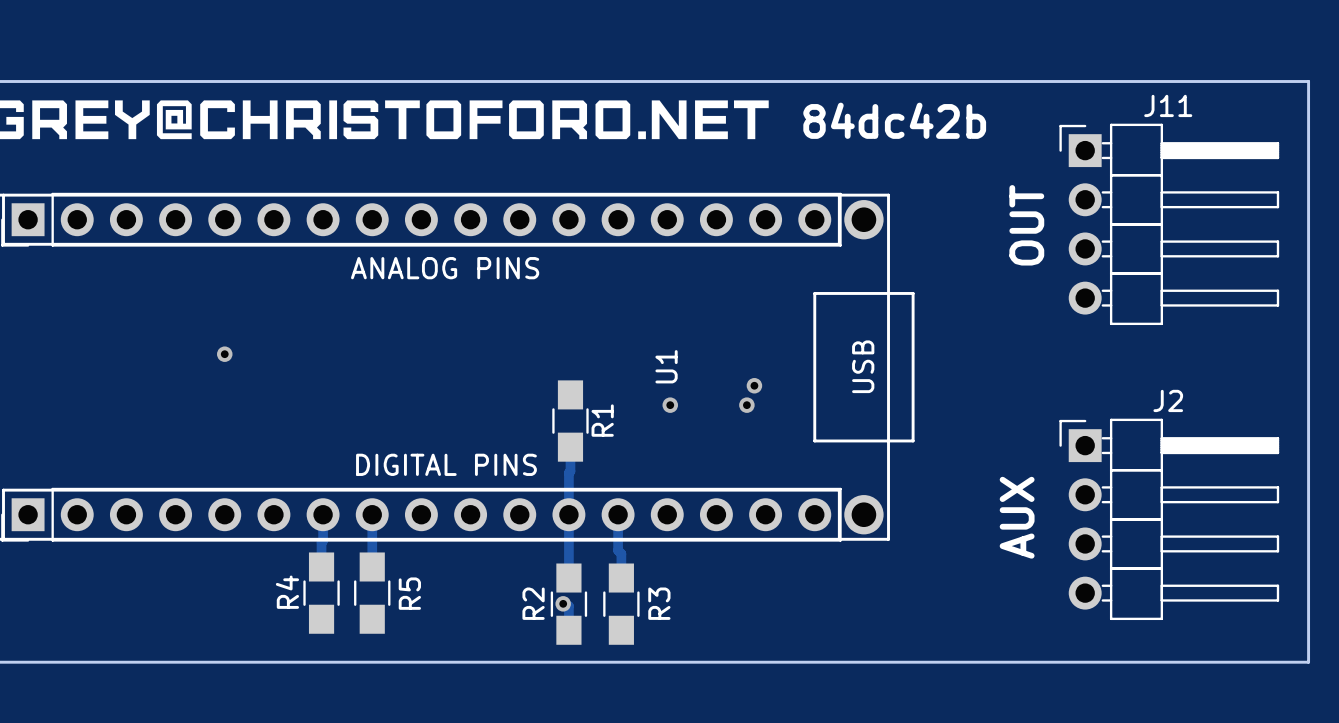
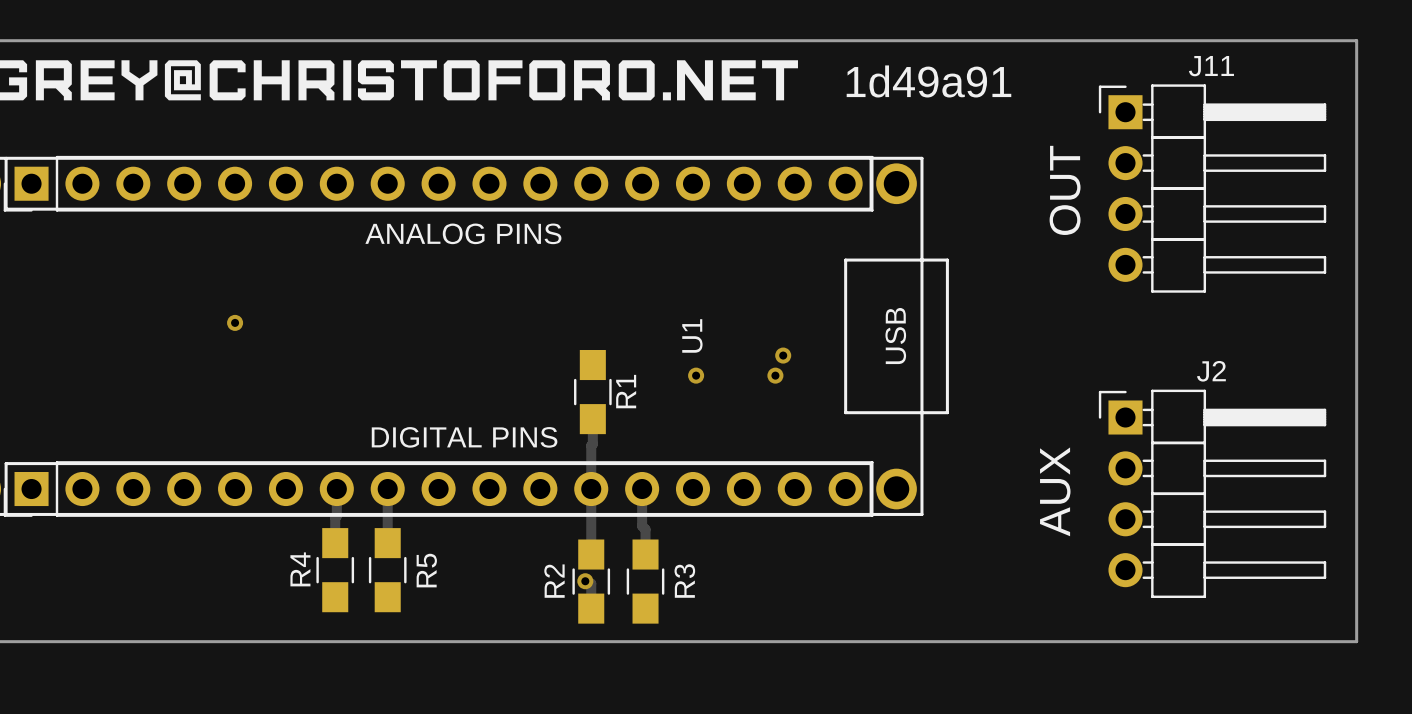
text: 84dc42b (894, 120) -> 1d49a91 (928, 81)

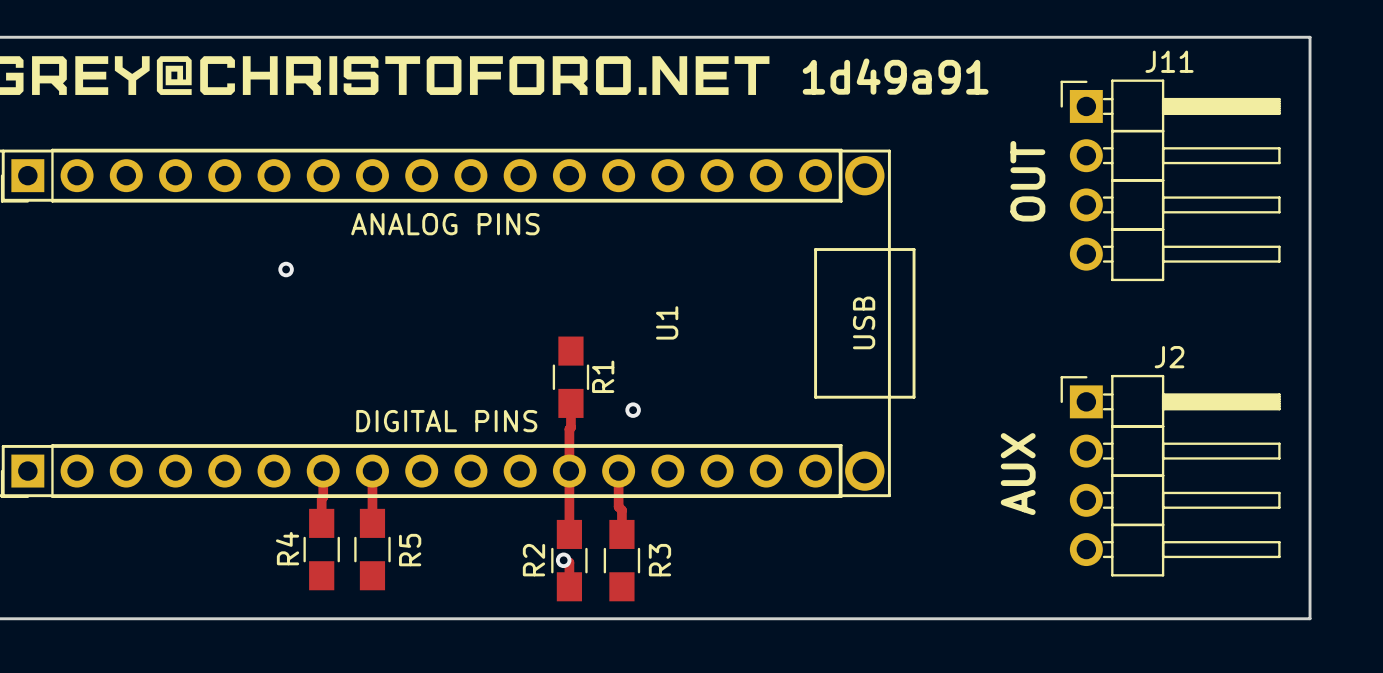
via position: (235, 322) -> (286, 269)
via: (783, 355) -> none
via position: (696, 375) -> (633, 410)
via: (775, 375) -> none

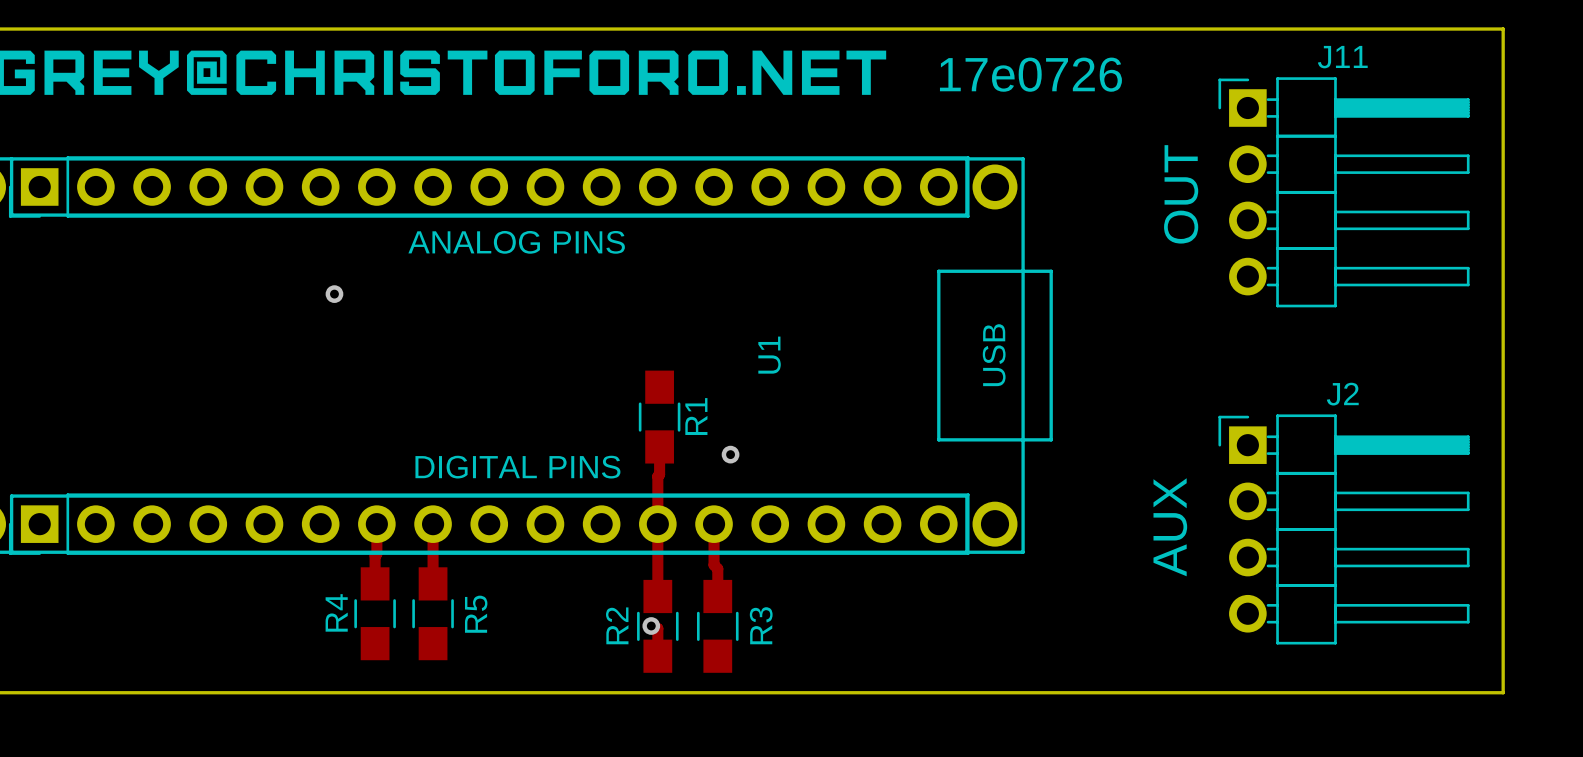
text: 1d49a91 (895, 76) -> 17e0726 (1030, 74)

